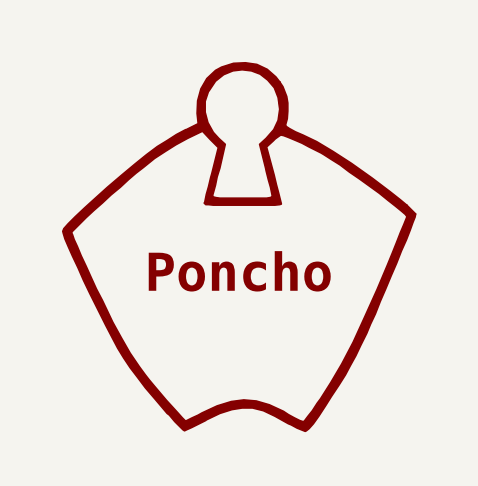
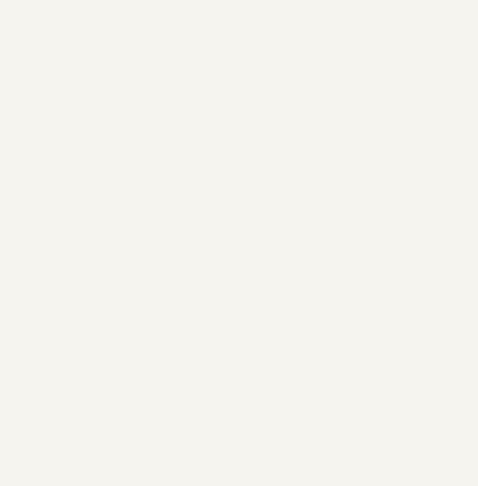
power symbol: (239, 247) -> none

